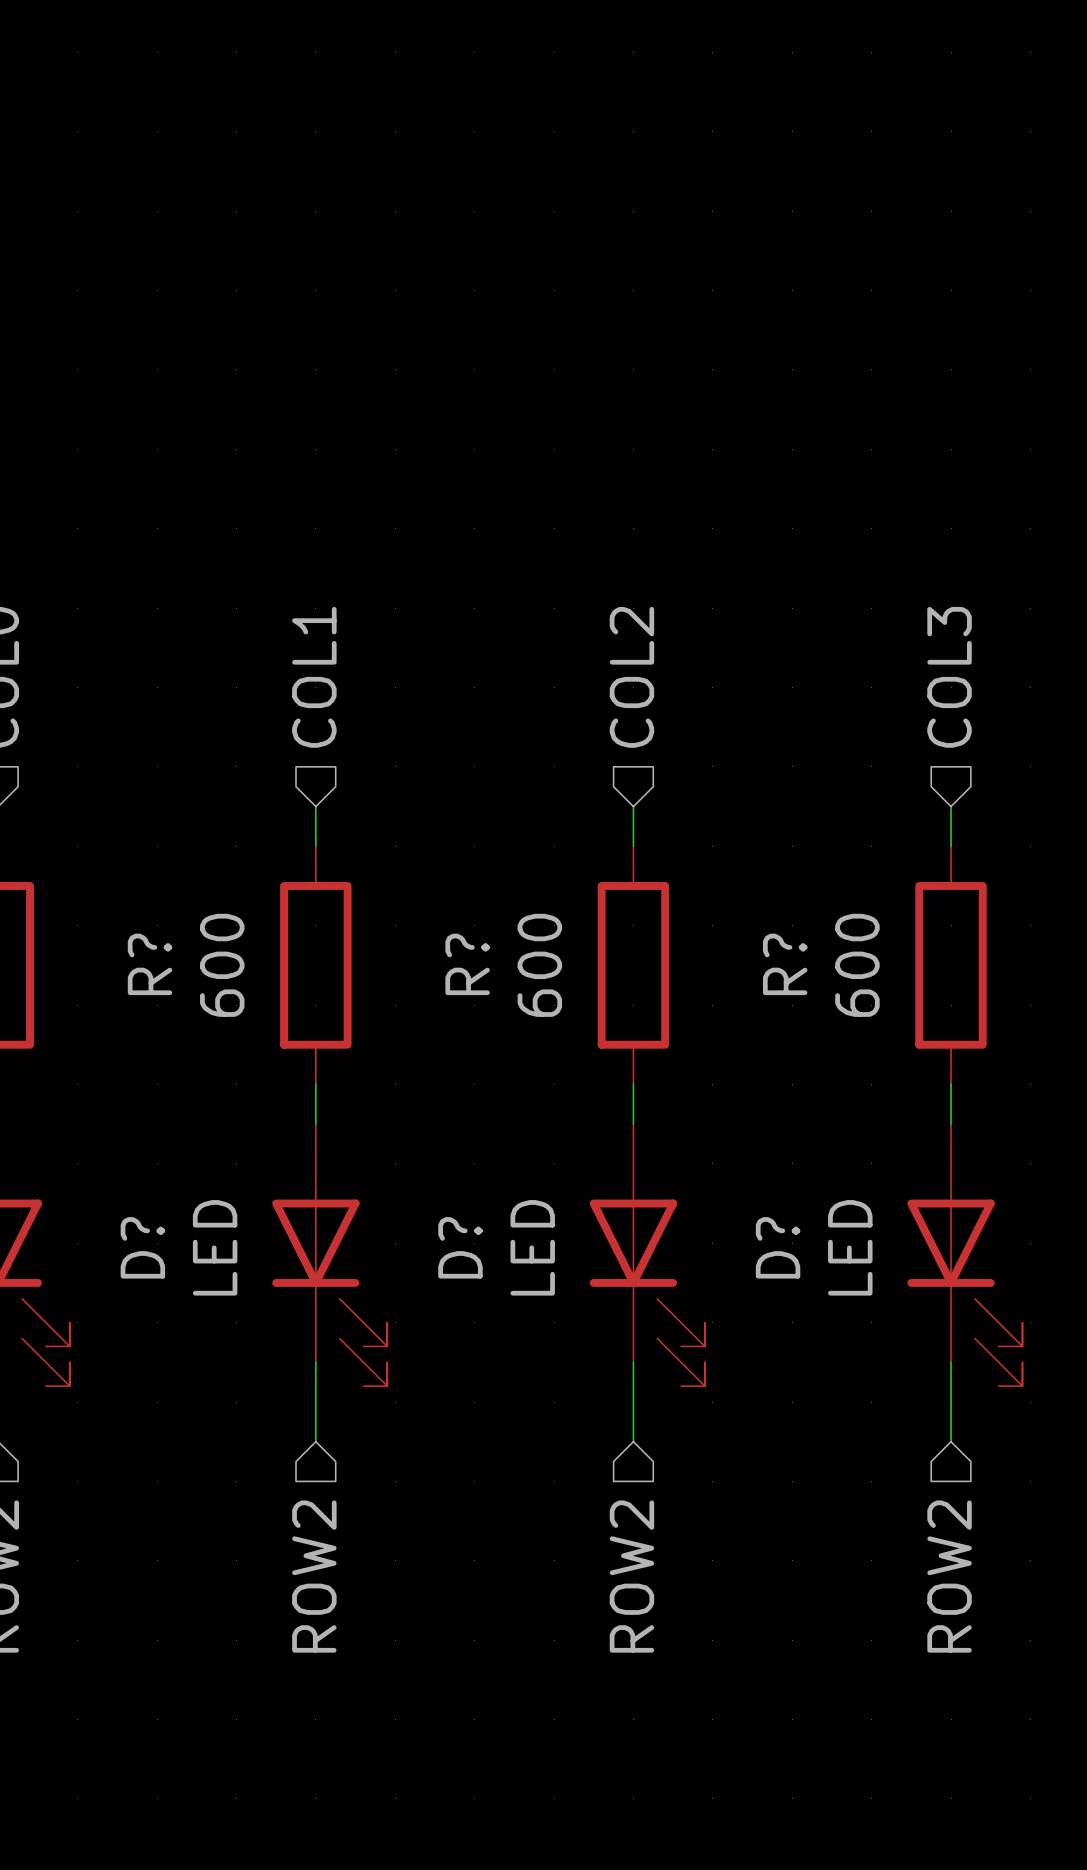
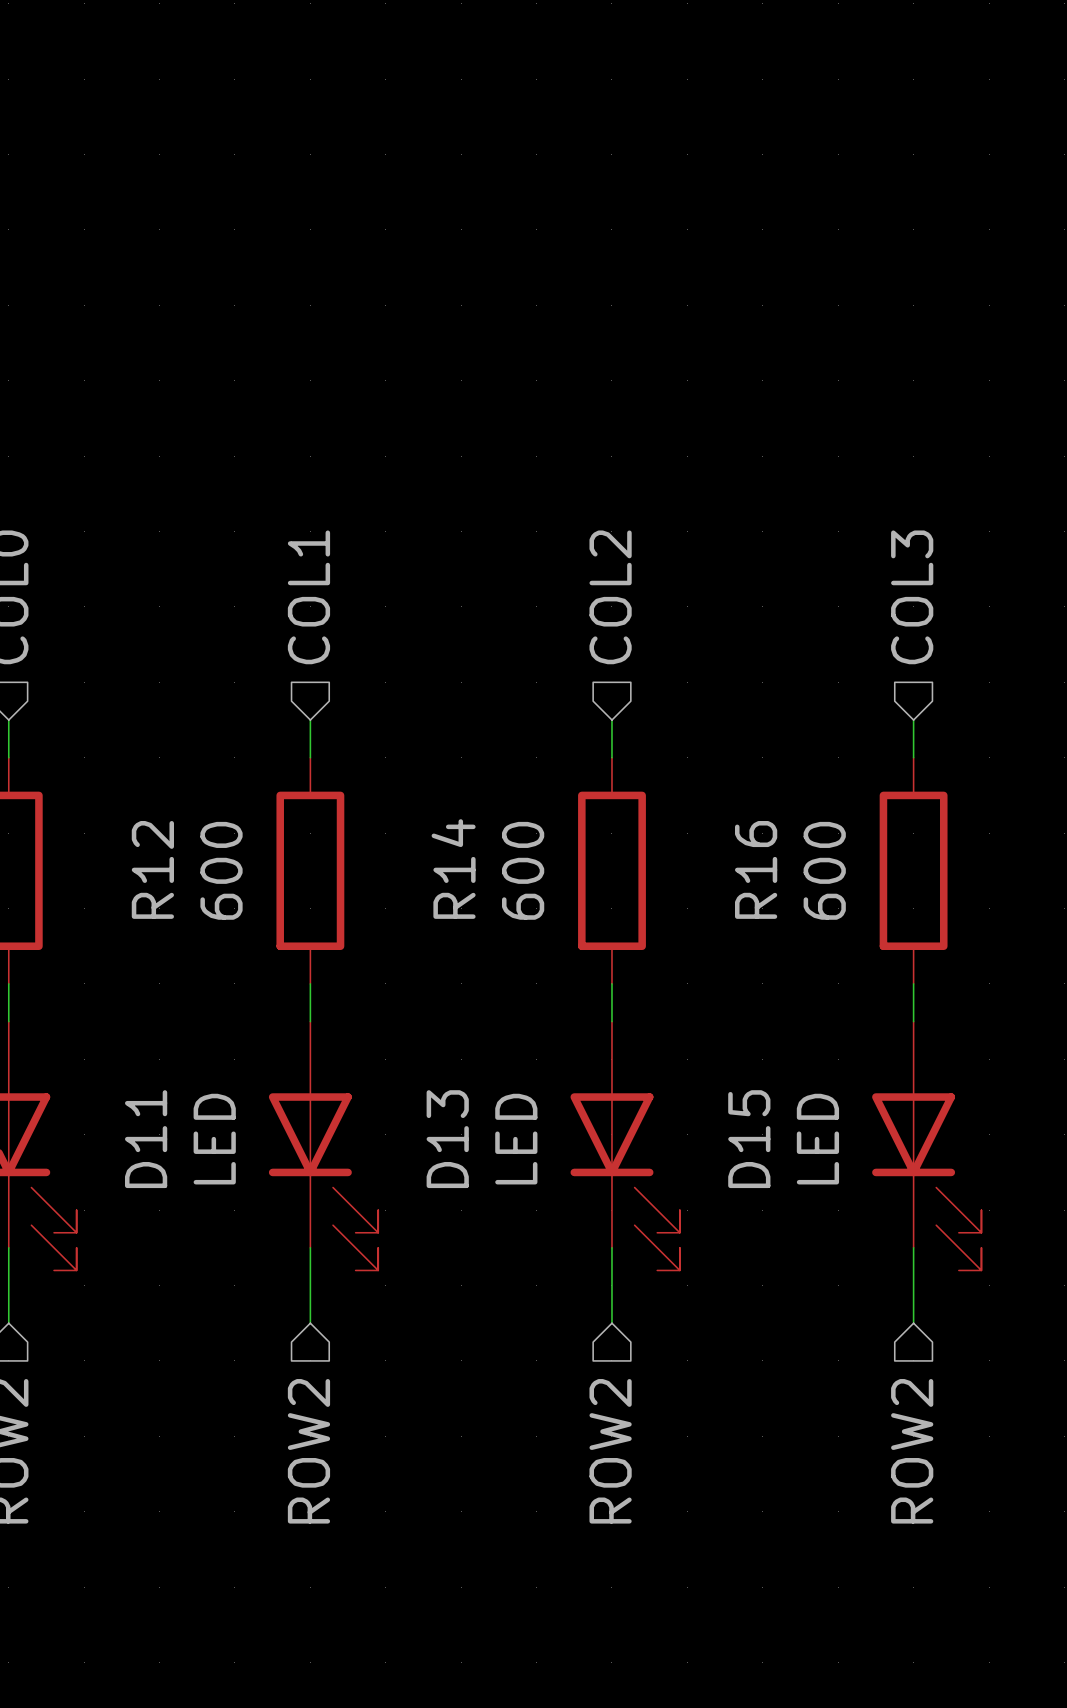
R? name: R? (150, 964) -> R12 (152, 869)
R? name: R? (467, 964) -> R14 (453, 869)
R? name: R? (785, 964) -> R16 (756, 869)
D? name: D? (142, 1247) -> D11 (146, 1139)
D? name: D? (460, 1247) -> D13 (447, 1139)
D? name: D? (778, 1247) -> D15 (749, 1139)

